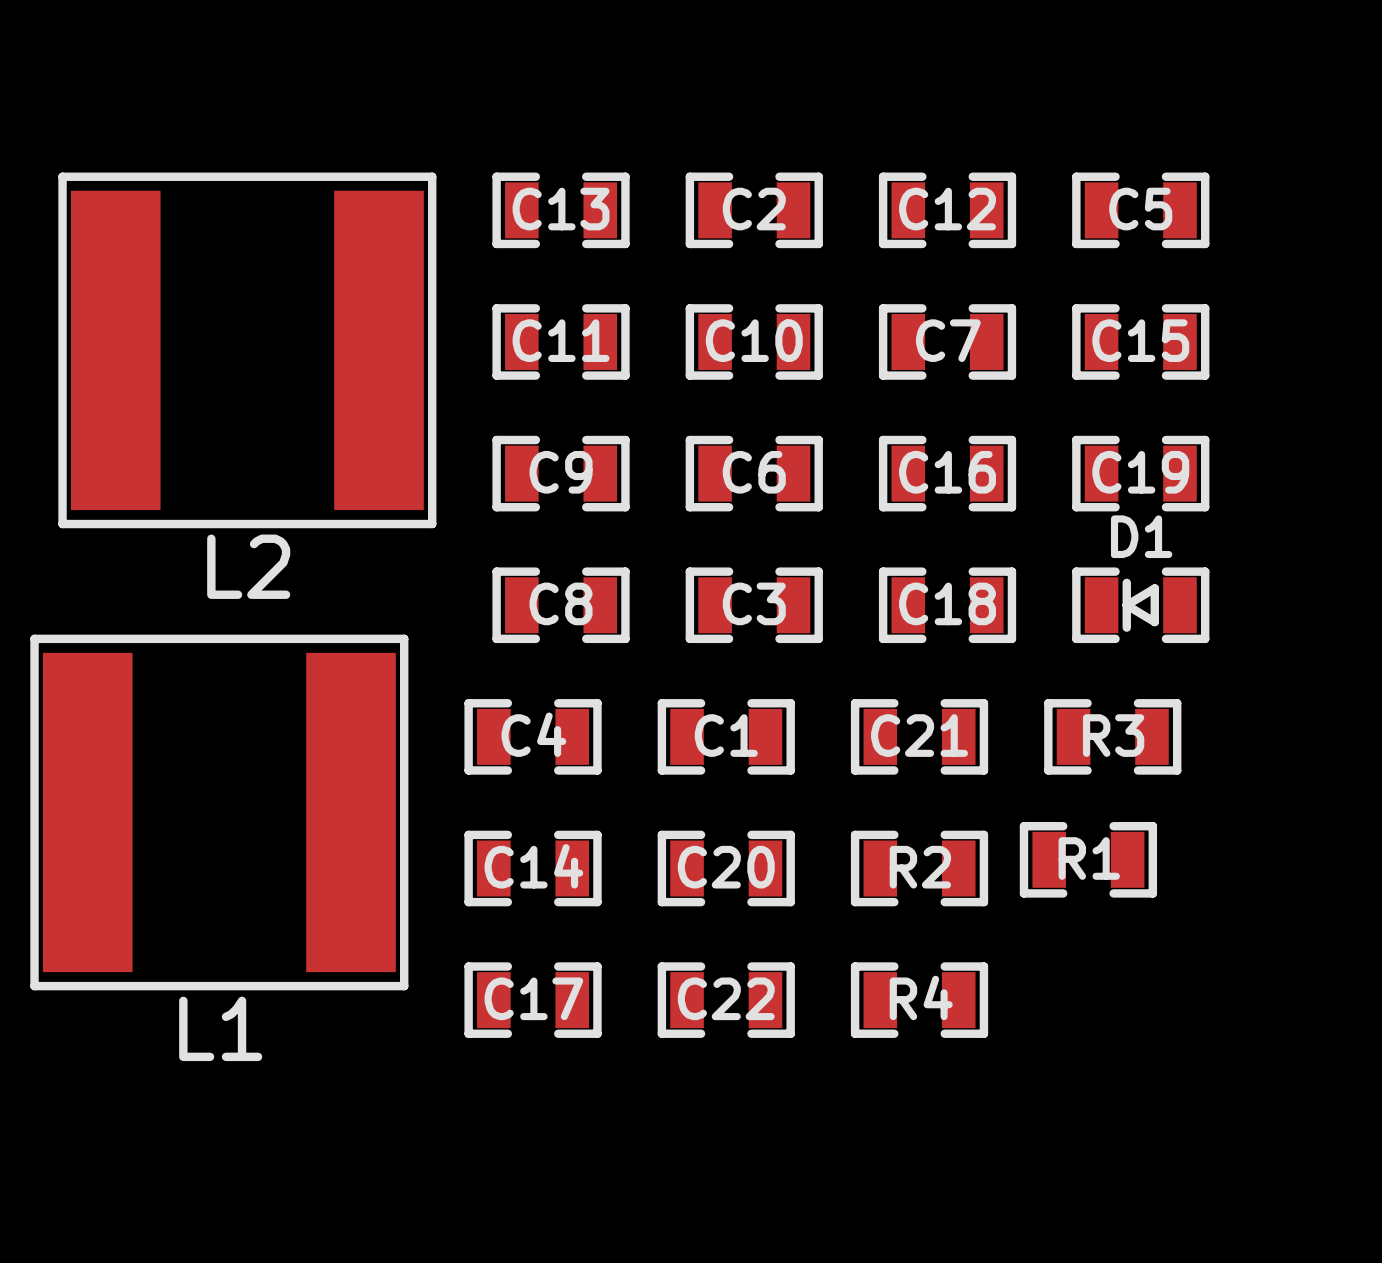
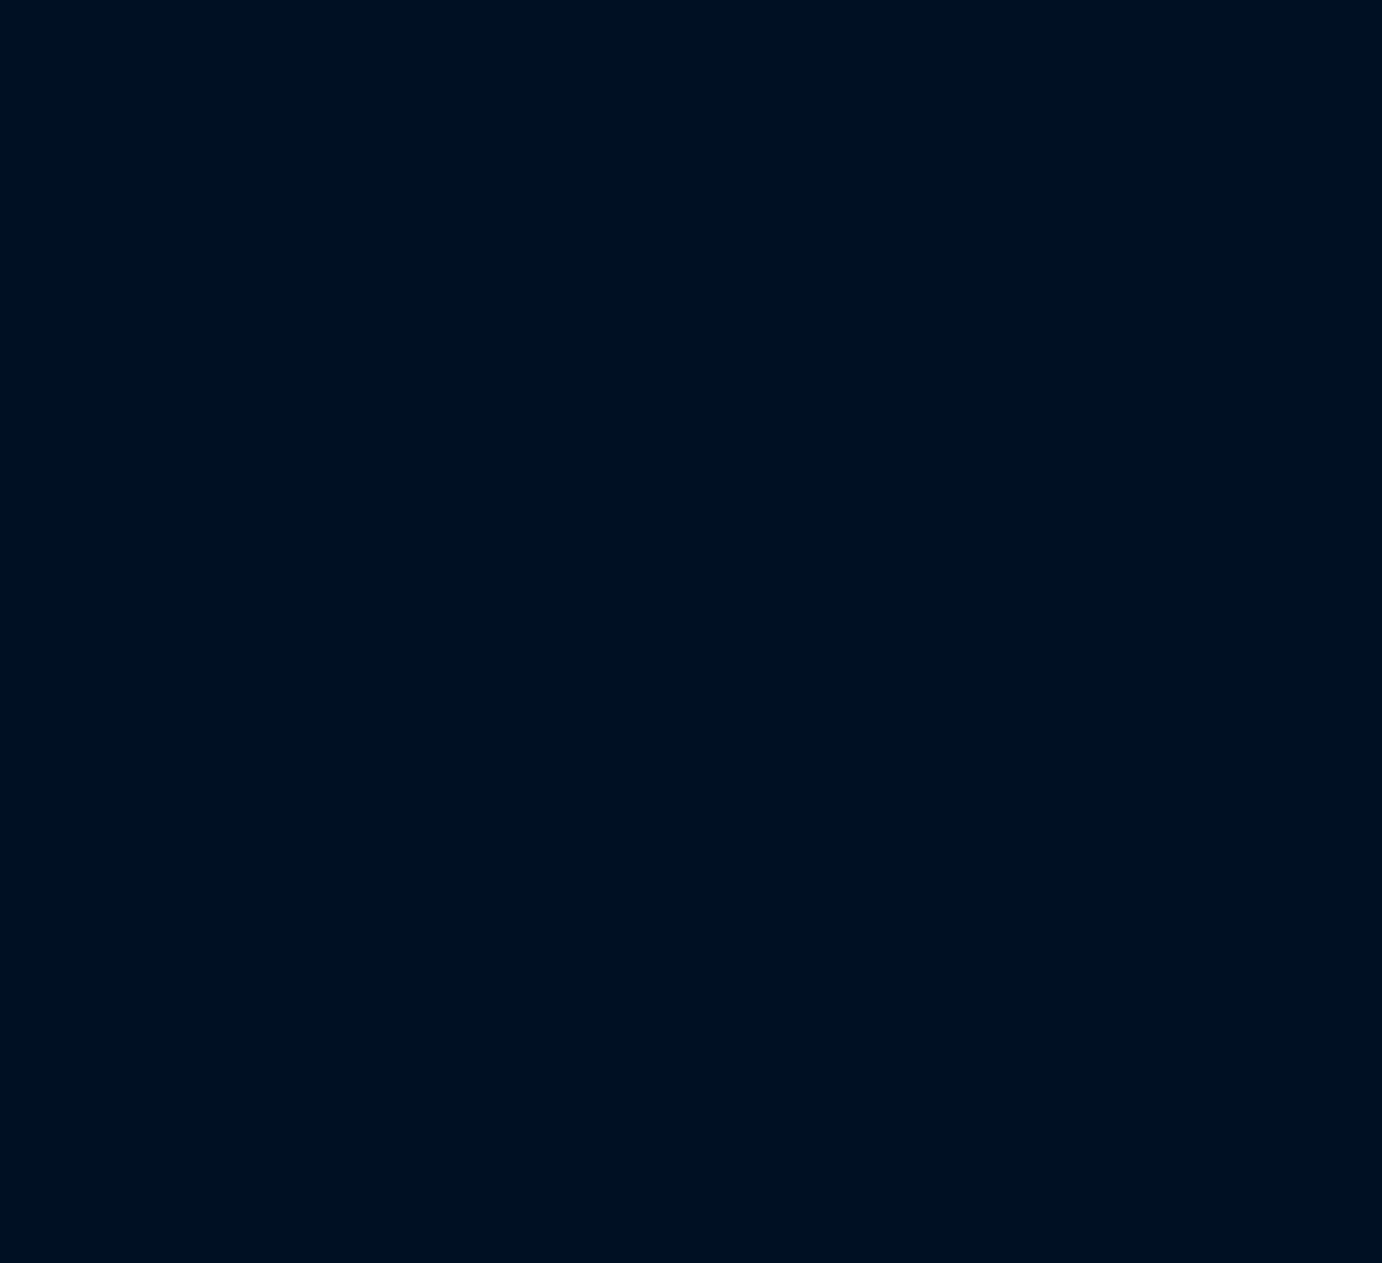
C13: (561, 210) -> none
C2: (754, 210) -> none
C12: (947, 210) -> none
C5: (1140, 210) -> none
C11: (561, 341) -> none
C10: (754, 341) -> none
C7: (947, 341) -> none
C15: (1140, 341) -> none
L2: (247, 350) -> none
C9: (561, 473) -> none
C6: (754, 473) -> none
C16: (947, 473) -> none
C19: (1140, 473) -> none
C8: (561, 605) -> none
C3: (754, 605) -> none
C18: (947, 605) -> none
D1: (1140, 605) -> none
C4: (533, 736) -> none
C1: (726, 736) -> none
C21: (919, 736) -> none
R3: (1112, 736) -> none
L1: (219, 812) -> none
R1: (1088, 859) -> none
C14: (533, 868) -> none
C20: (726, 868) -> none
R2: (919, 868) -> none
C17: (533, 1000) -> none
C22: (726, 1000) -> none
R4: (919, 1000) -> none

